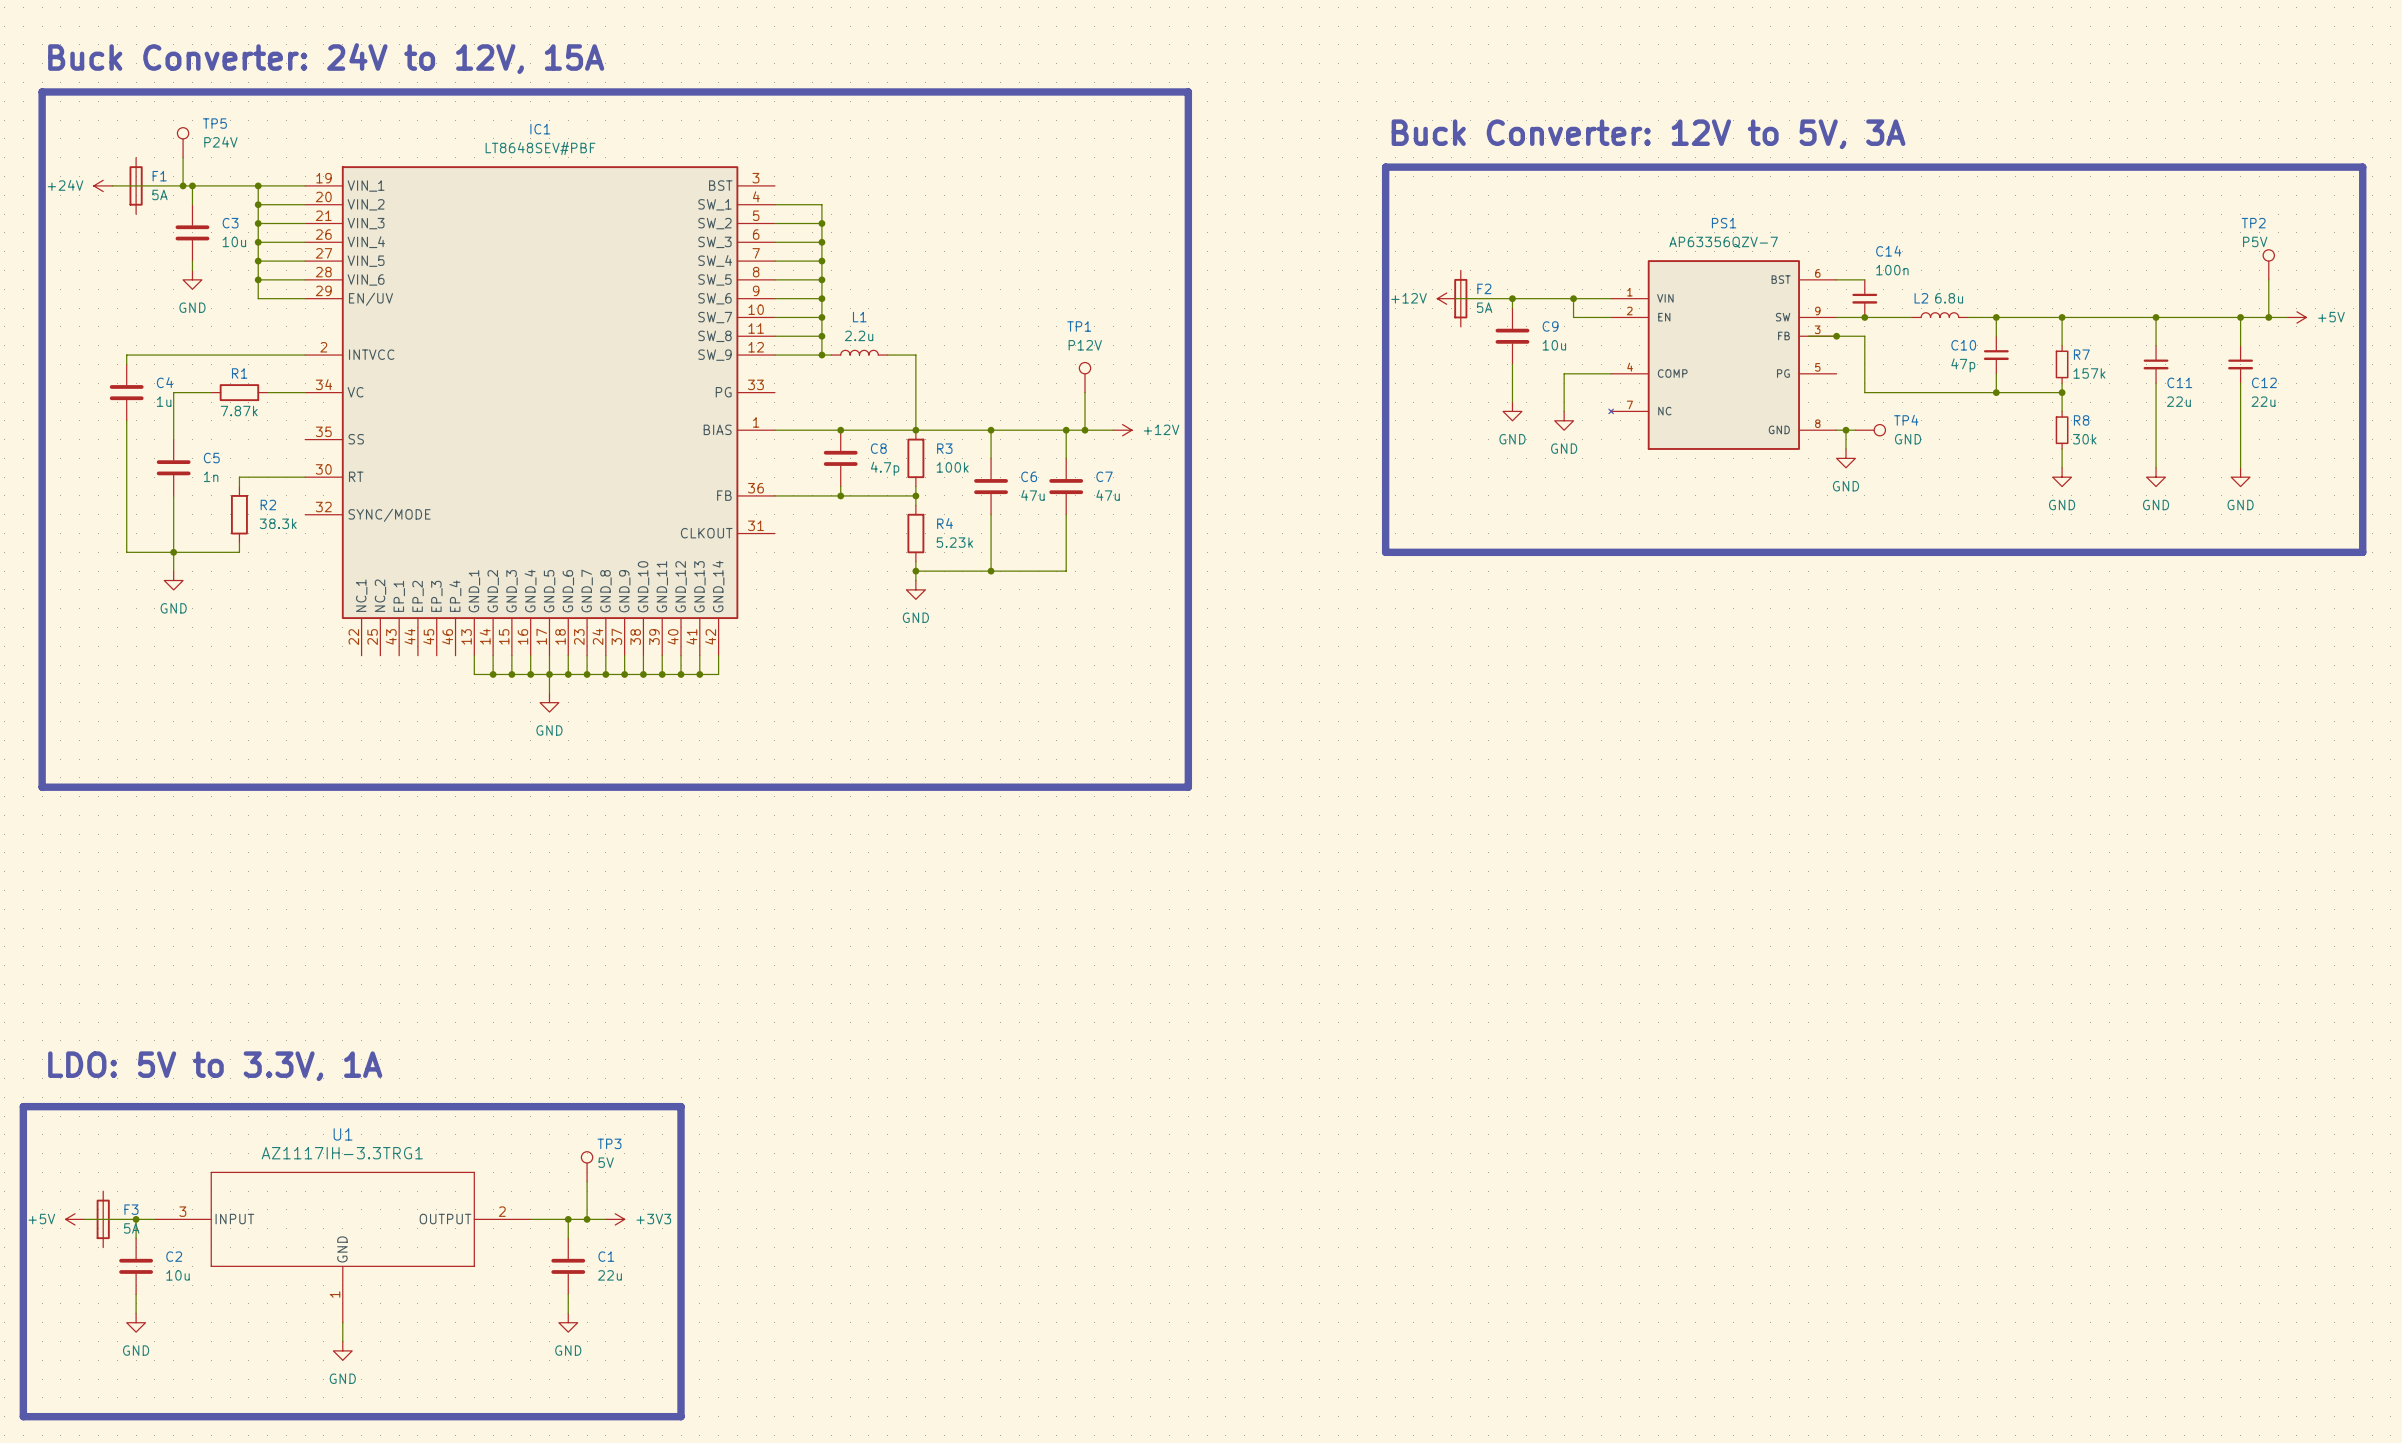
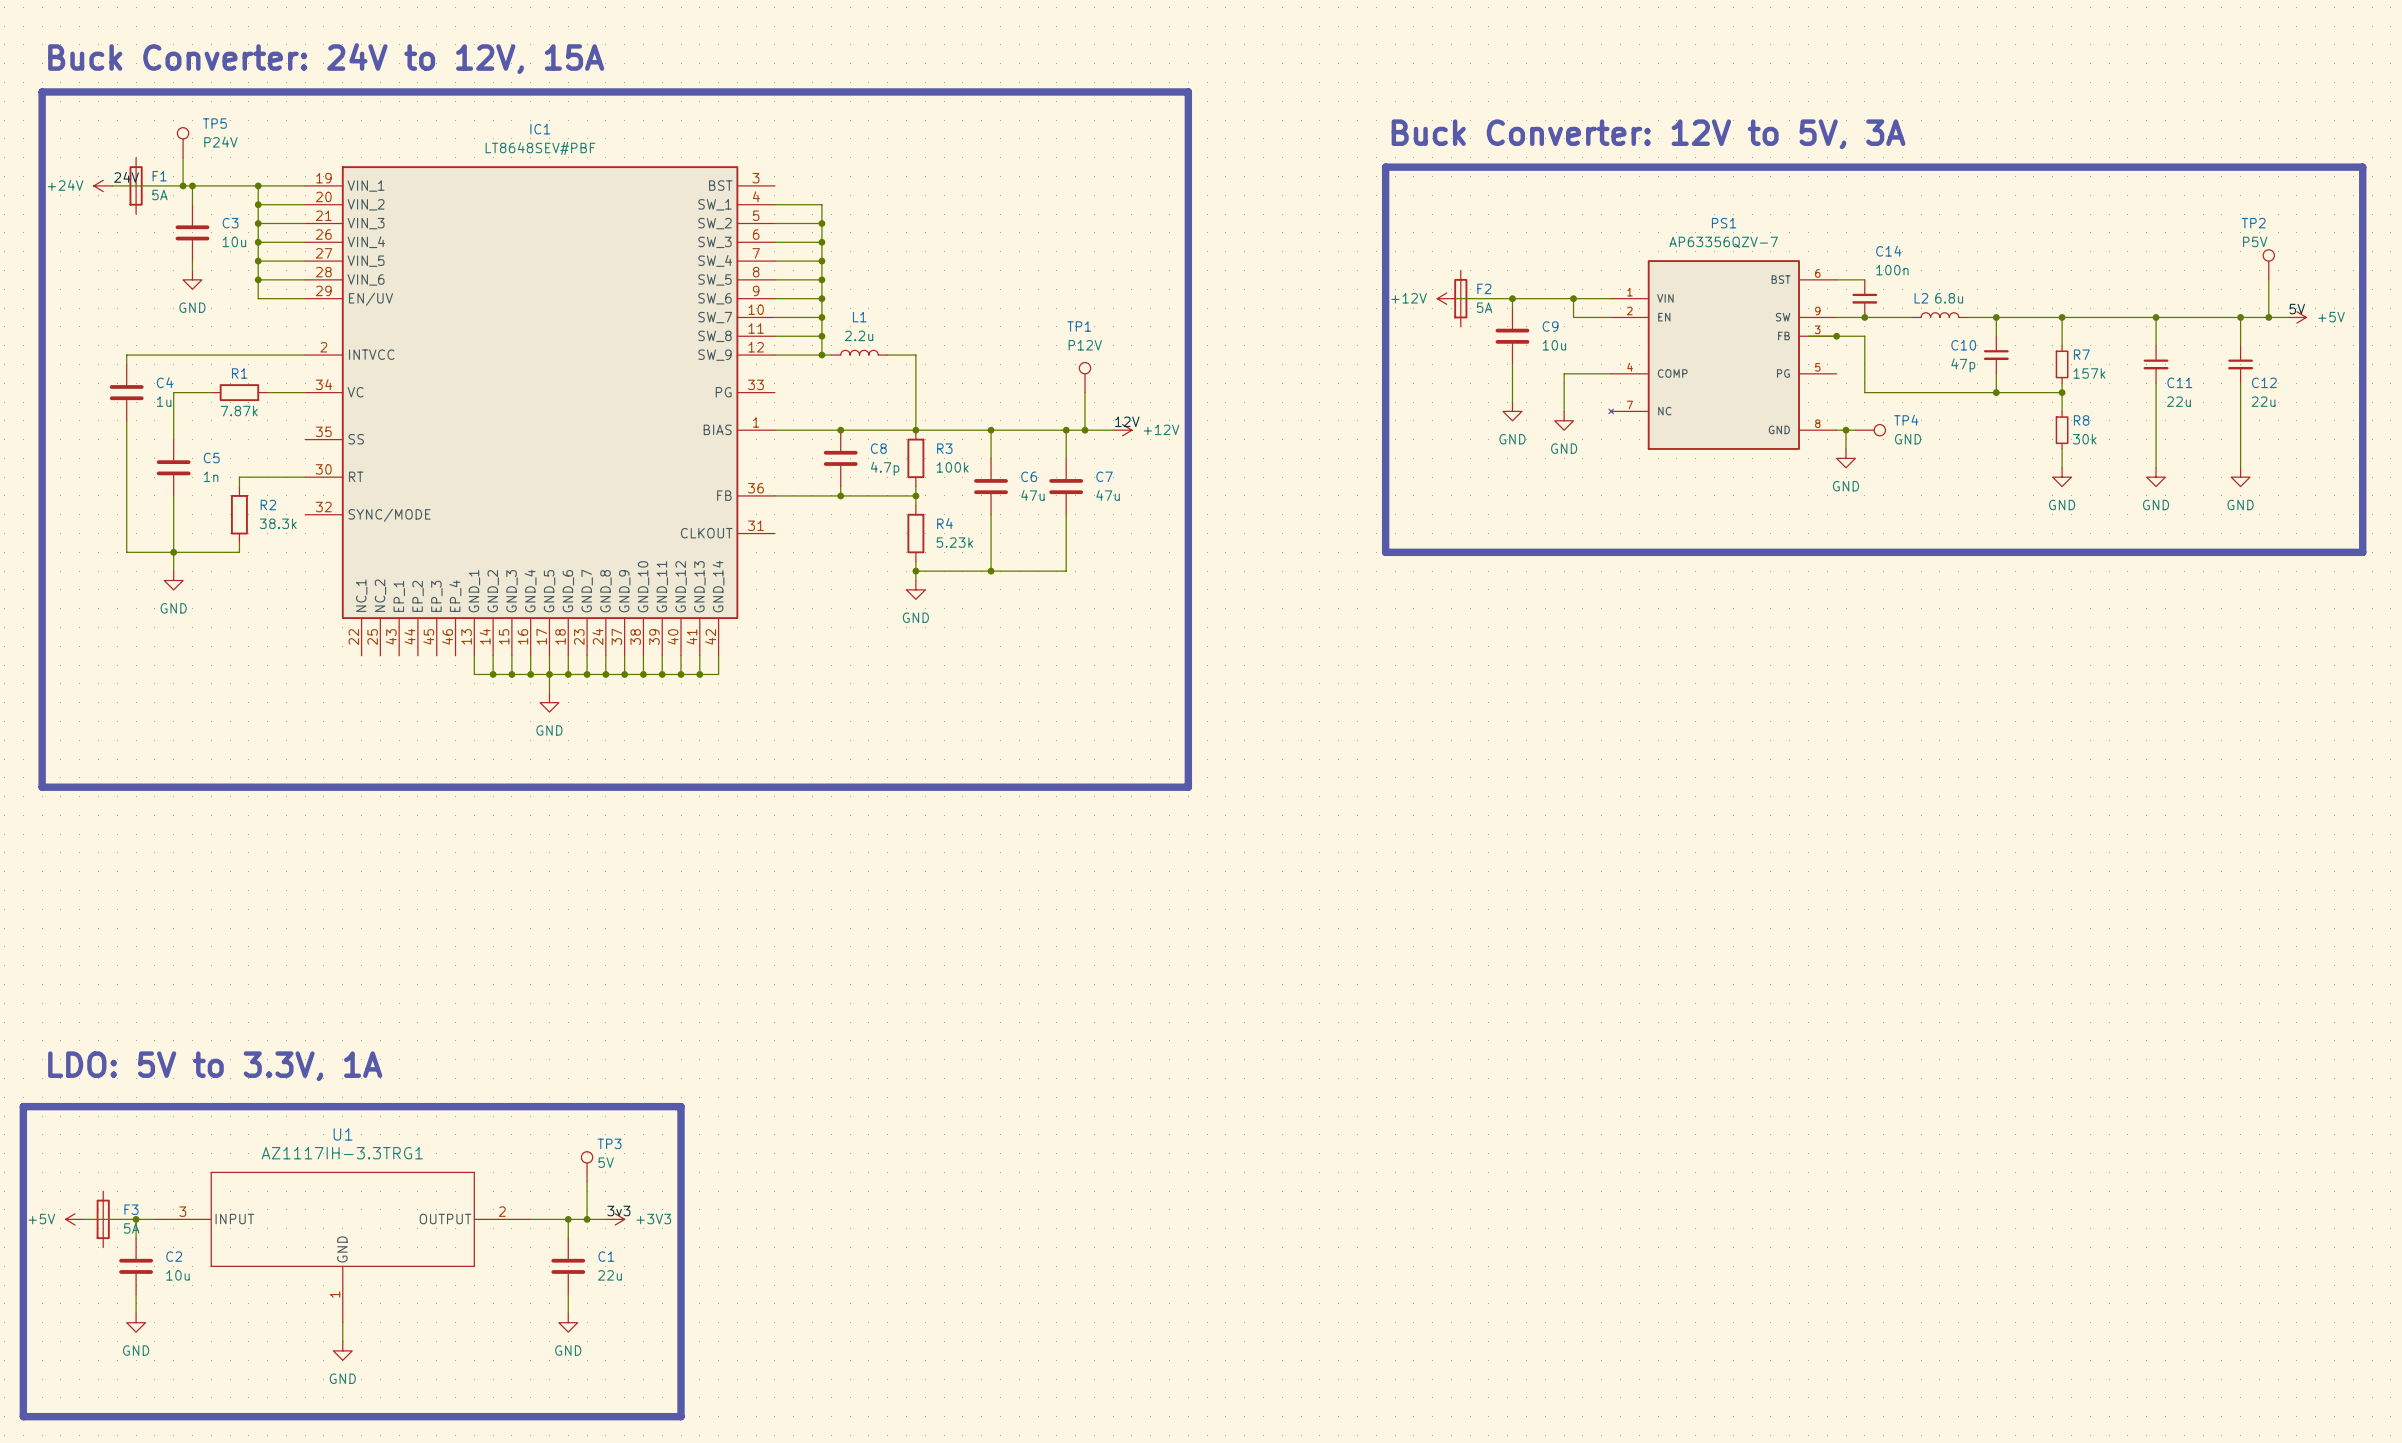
label: none -> 24V (126, 177)
label: none -> 5V (2297, 309)
label: none -> 12V (1127, 421)
label: none -> 3v3 (618, 1211)

